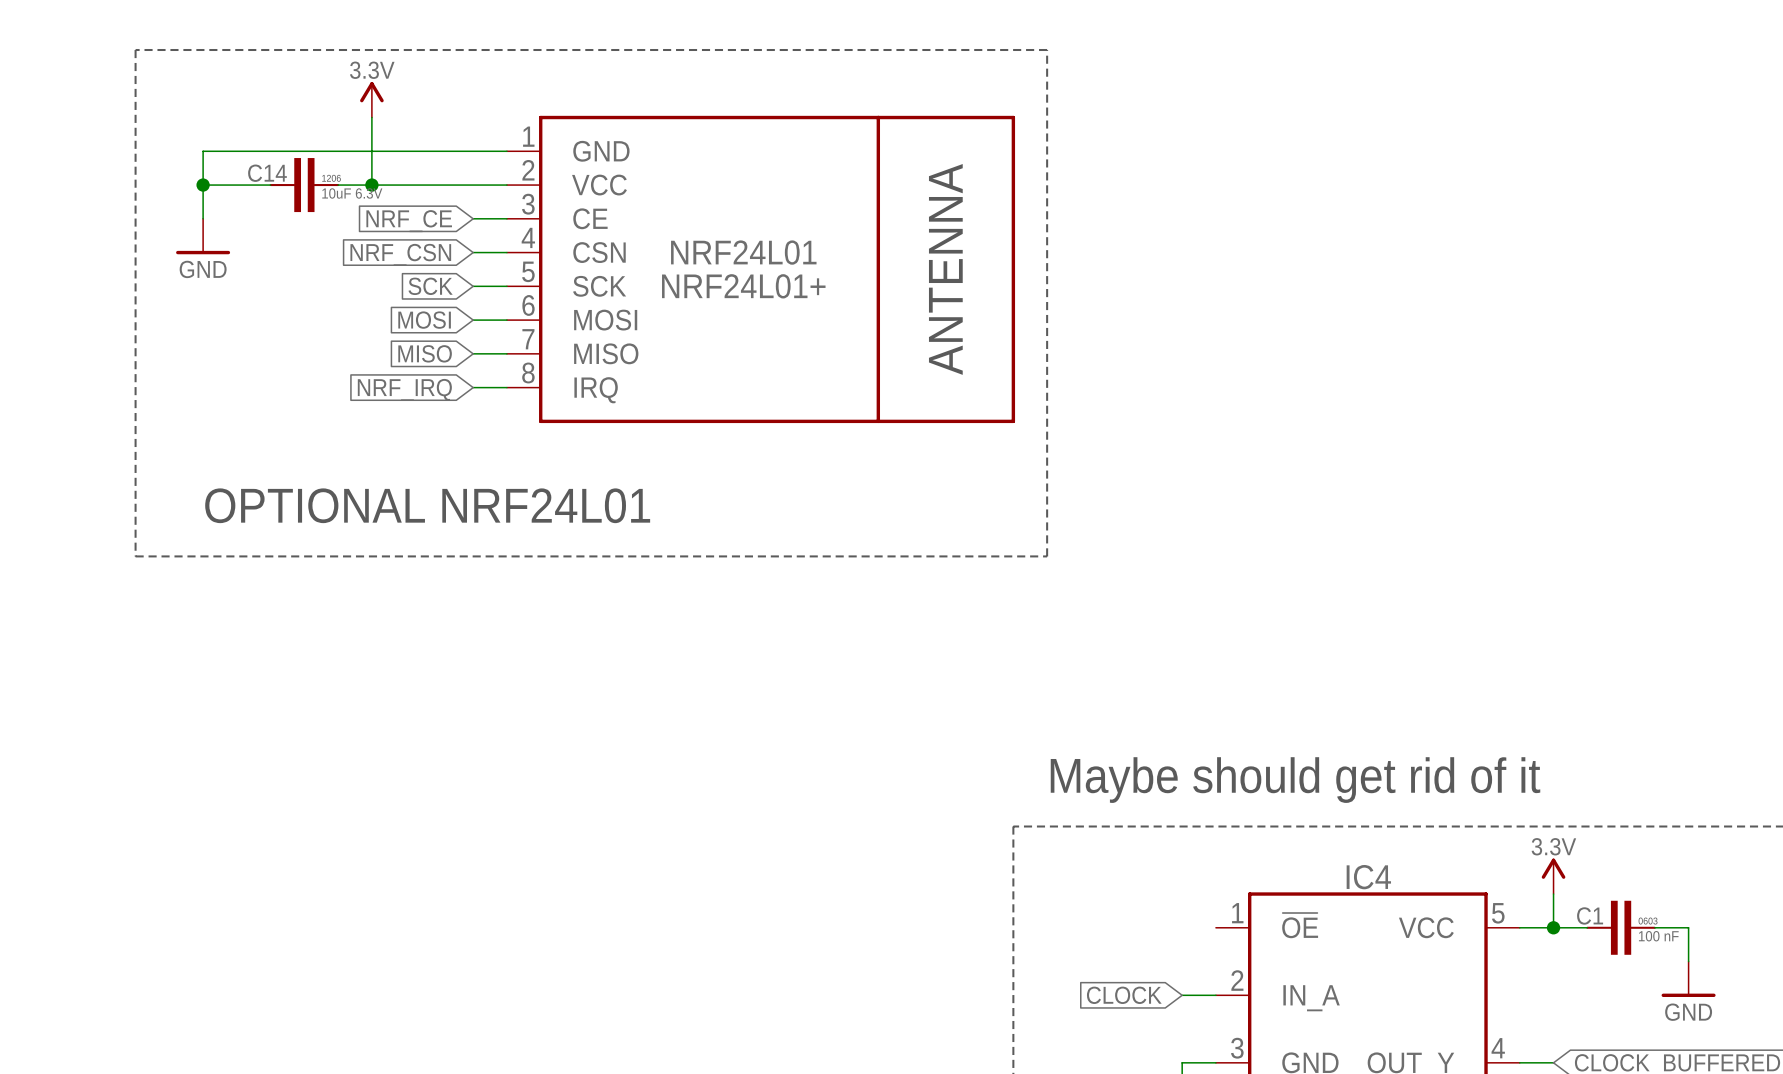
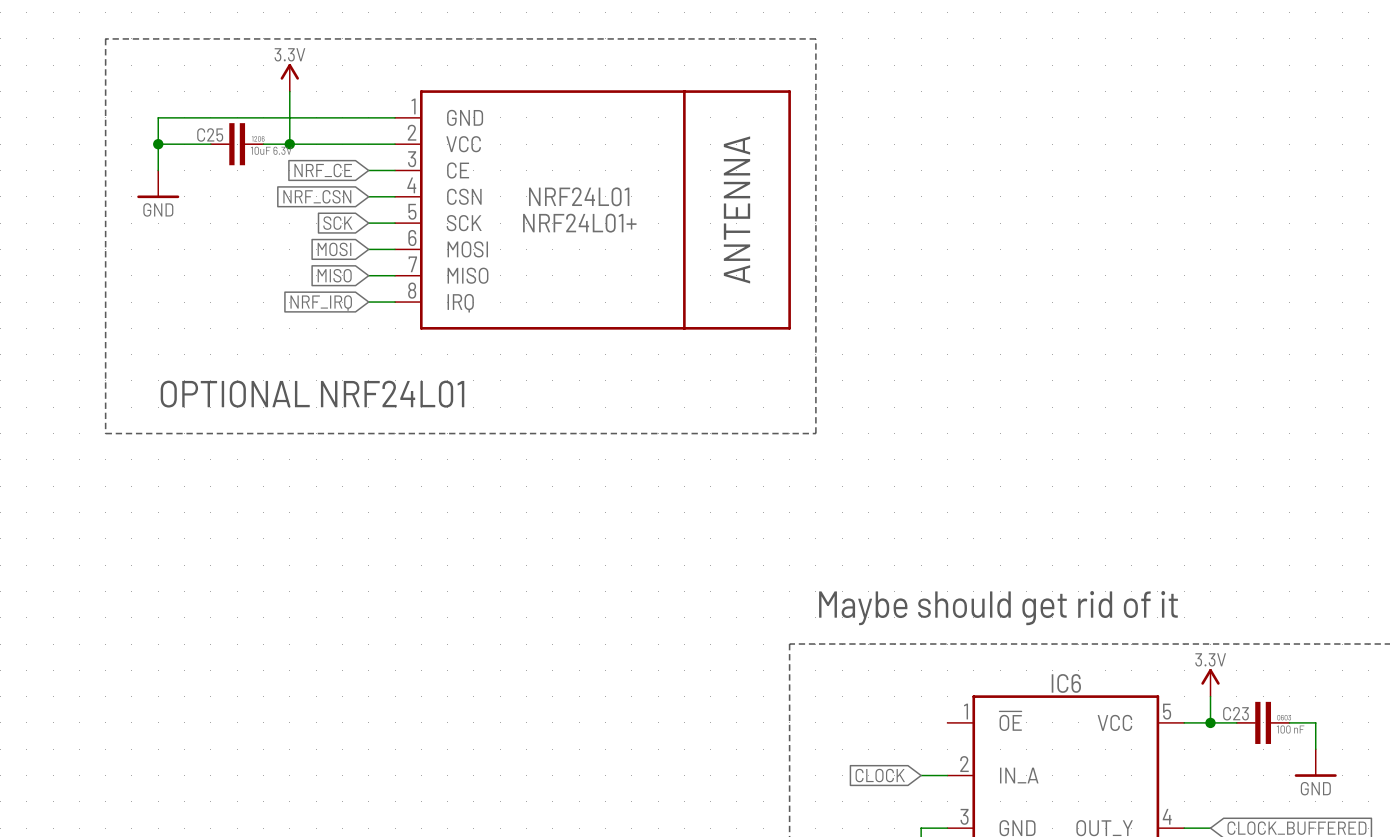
C14 name: C14 (267, 173) -> C25 (210, 134)
IC4 name: IC4 (1368, 877) -> IC6 (1066, 683)
C1 name: C1 (1590, 915) -> C23 (1236, 713)

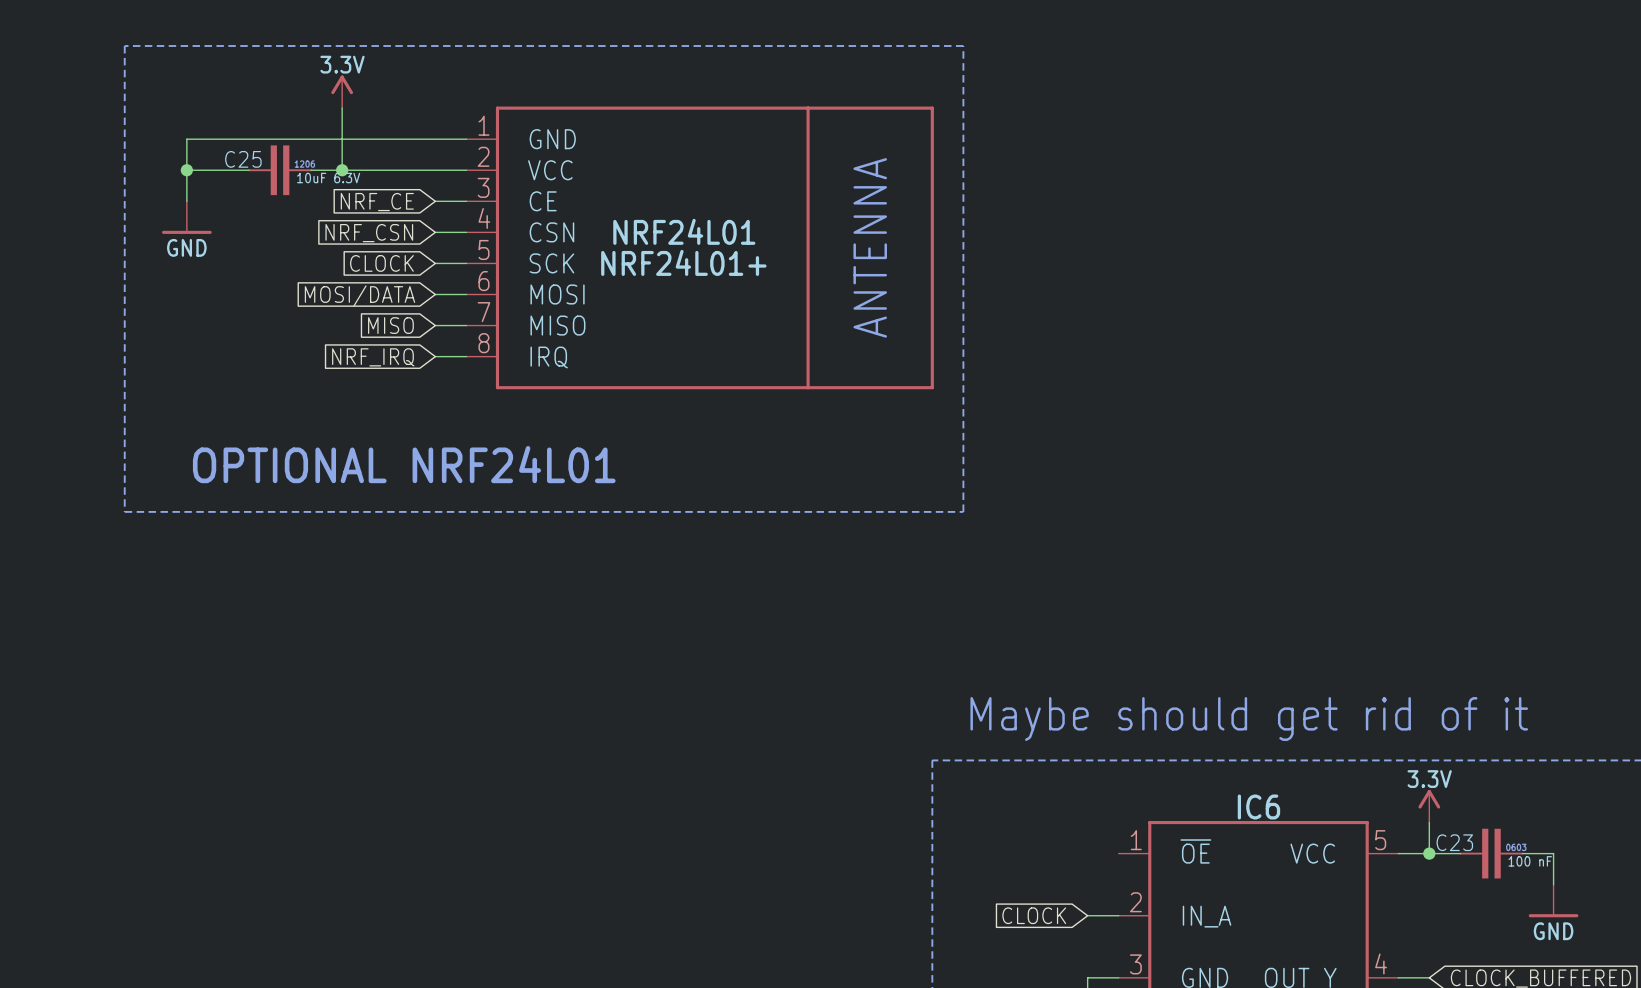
global label: SCK (337, 223) -> CLOCK (381, 263)
global label: MOSI (334, 249) -> MOSI/DATA (359, 295)

